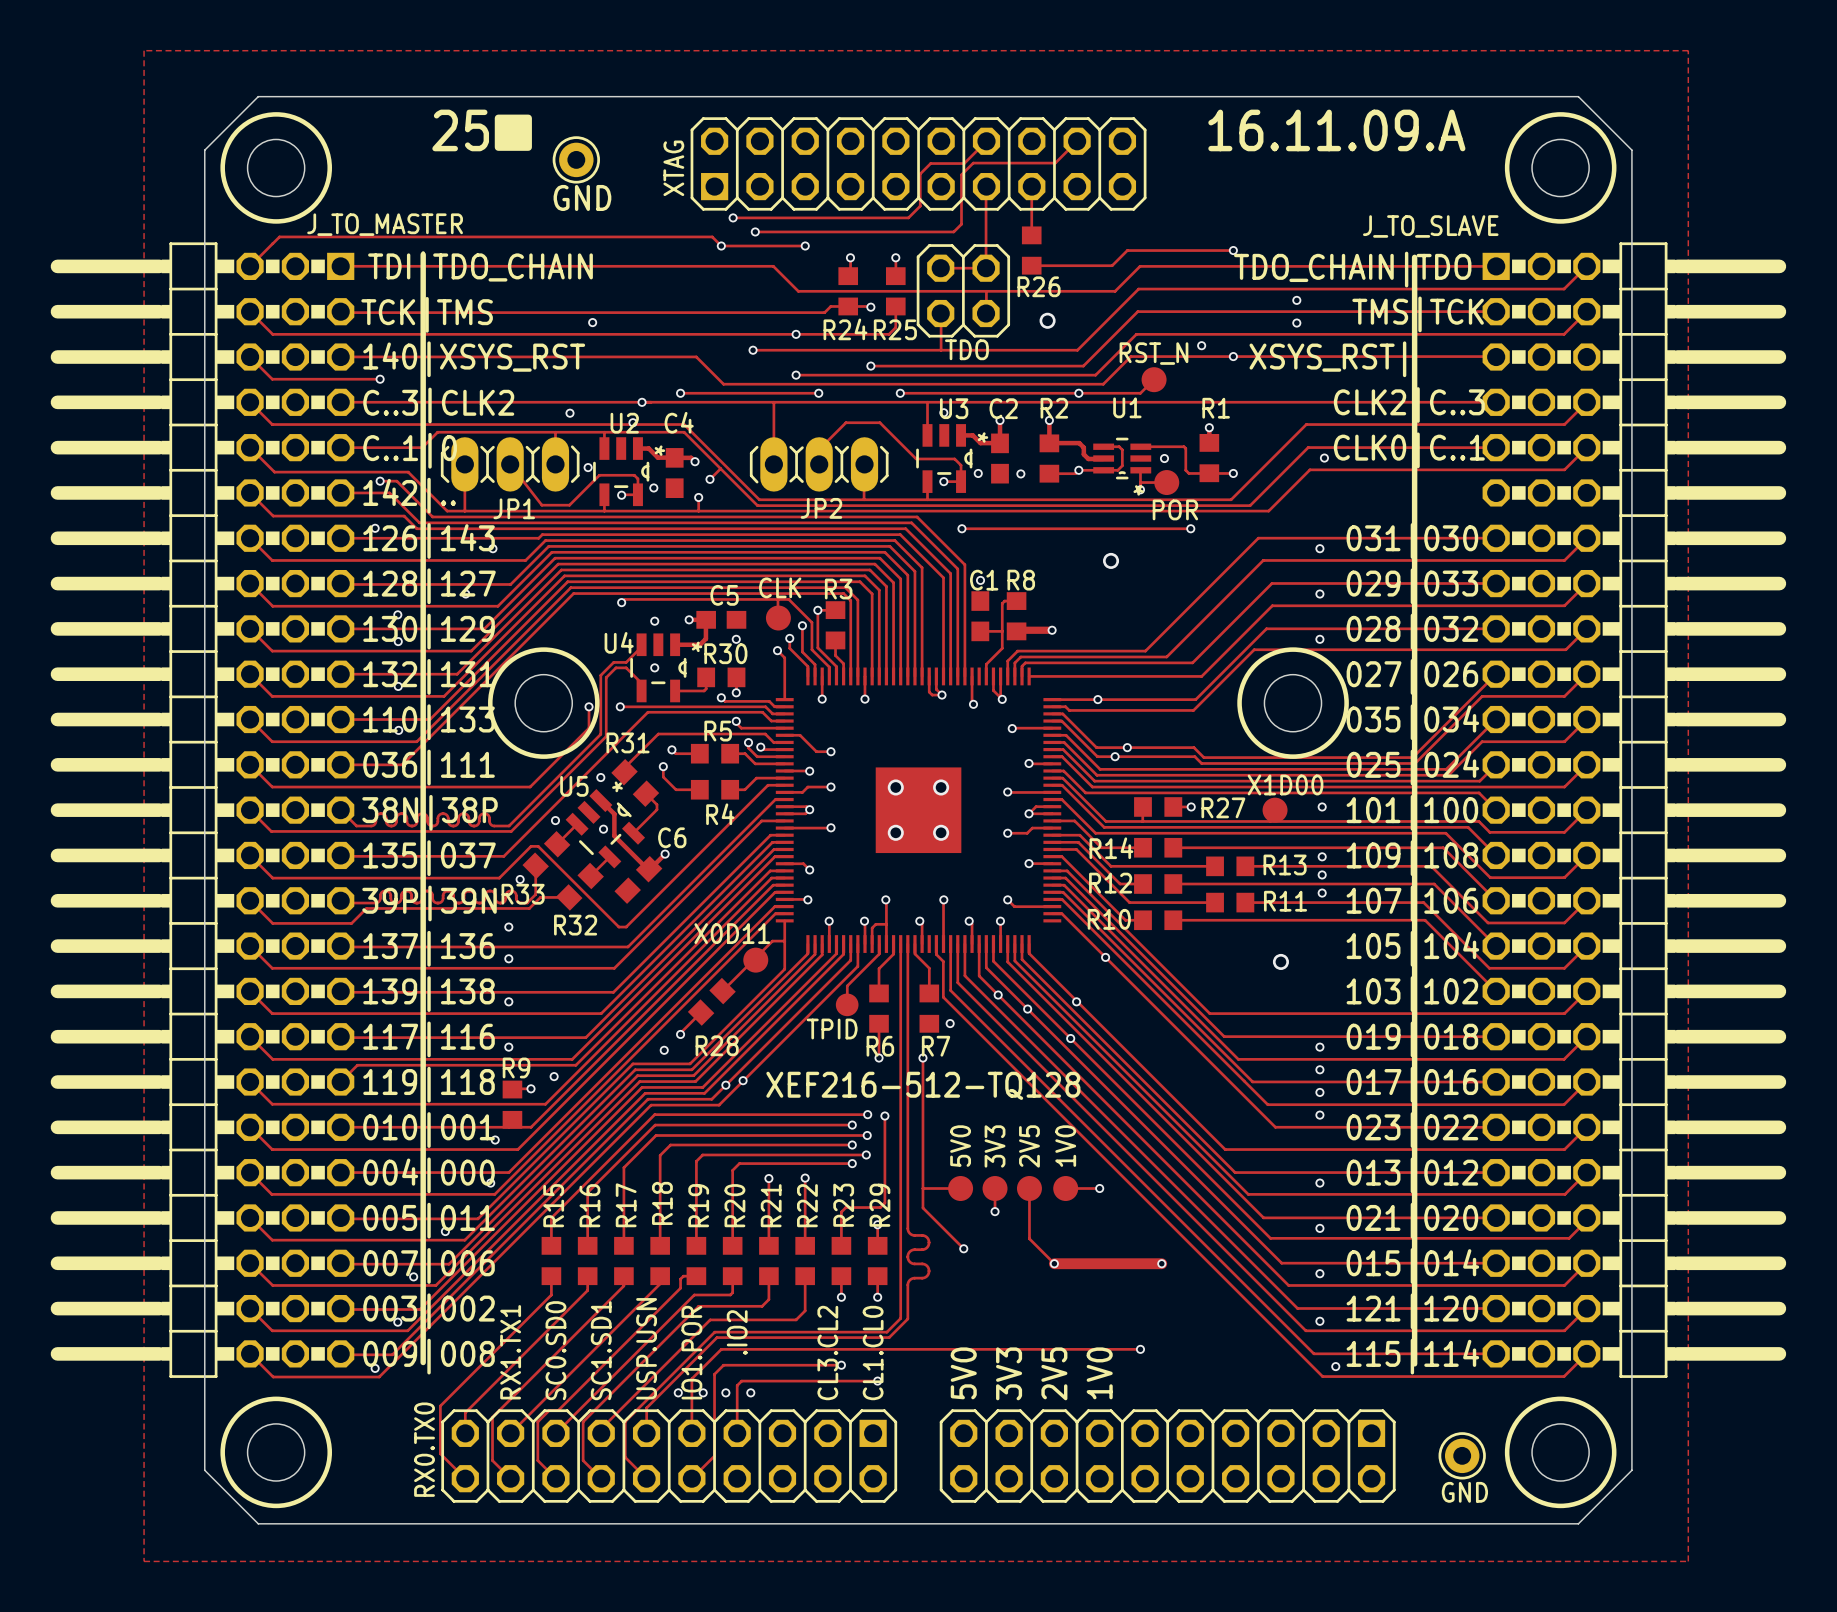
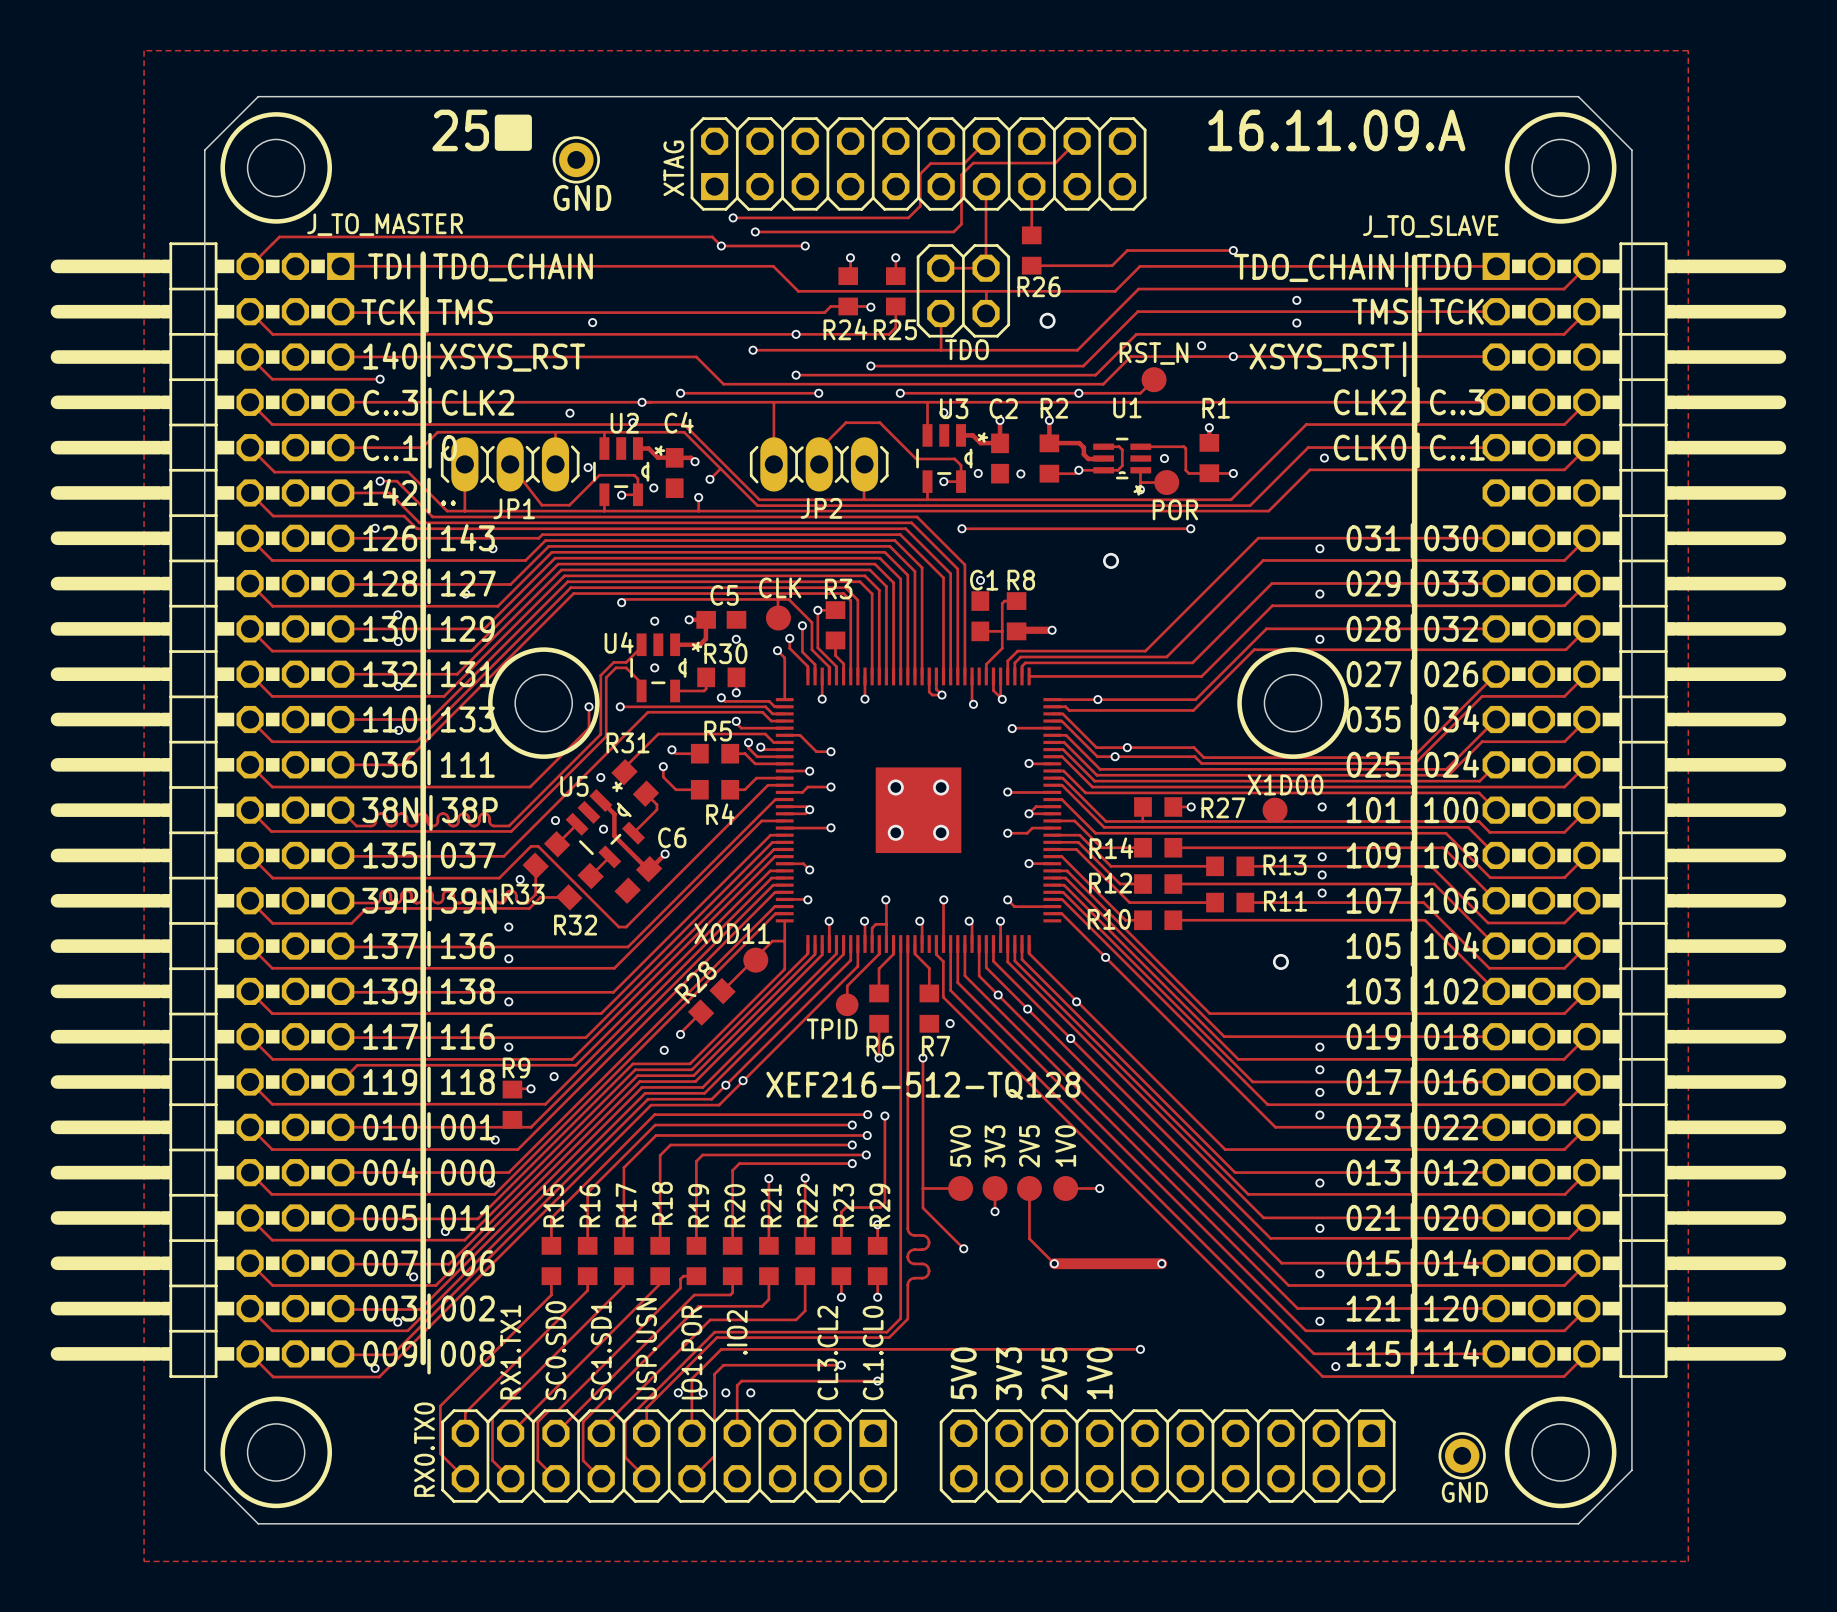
R28 name rotation: 0° (717, 1045) -> 45° counterclockwise (695, 982)
R28 name position: R28 (717, 1045) -> R28 (695, 982)

